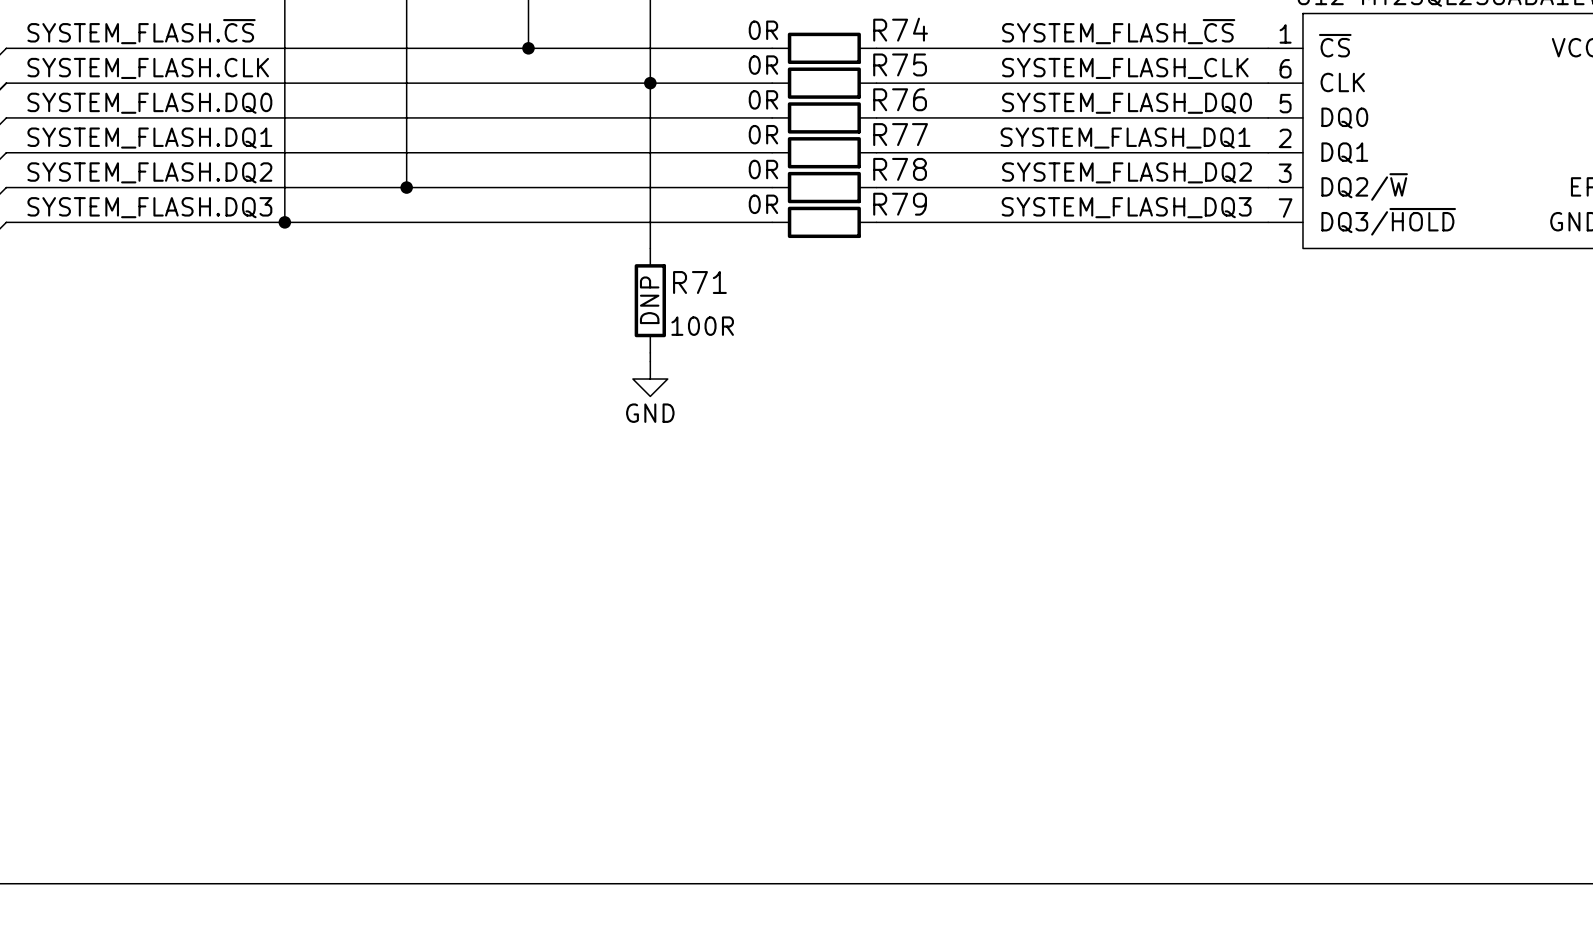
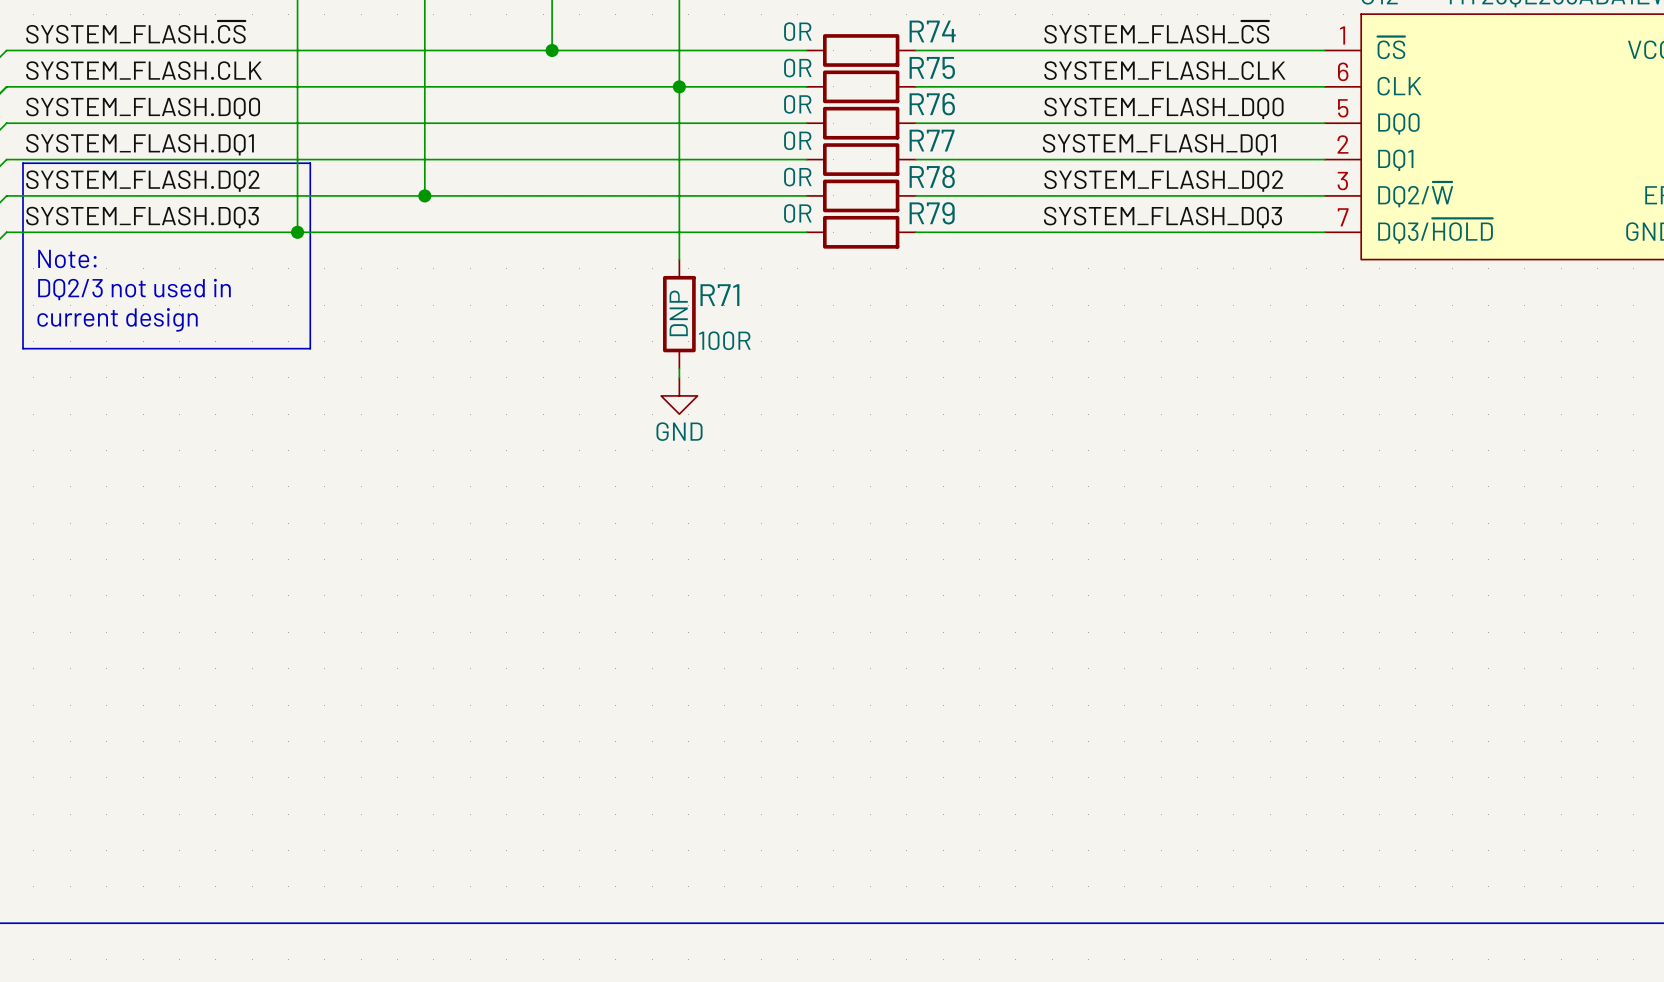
line: none -> (23, 163) (310, 163) (310, 348) (23, 348) (23, 163)
text: none -> Note: (67, 258)
text: none -> DQ2/3 not used in (134, 289)
text: none -> current design (117, 319)

